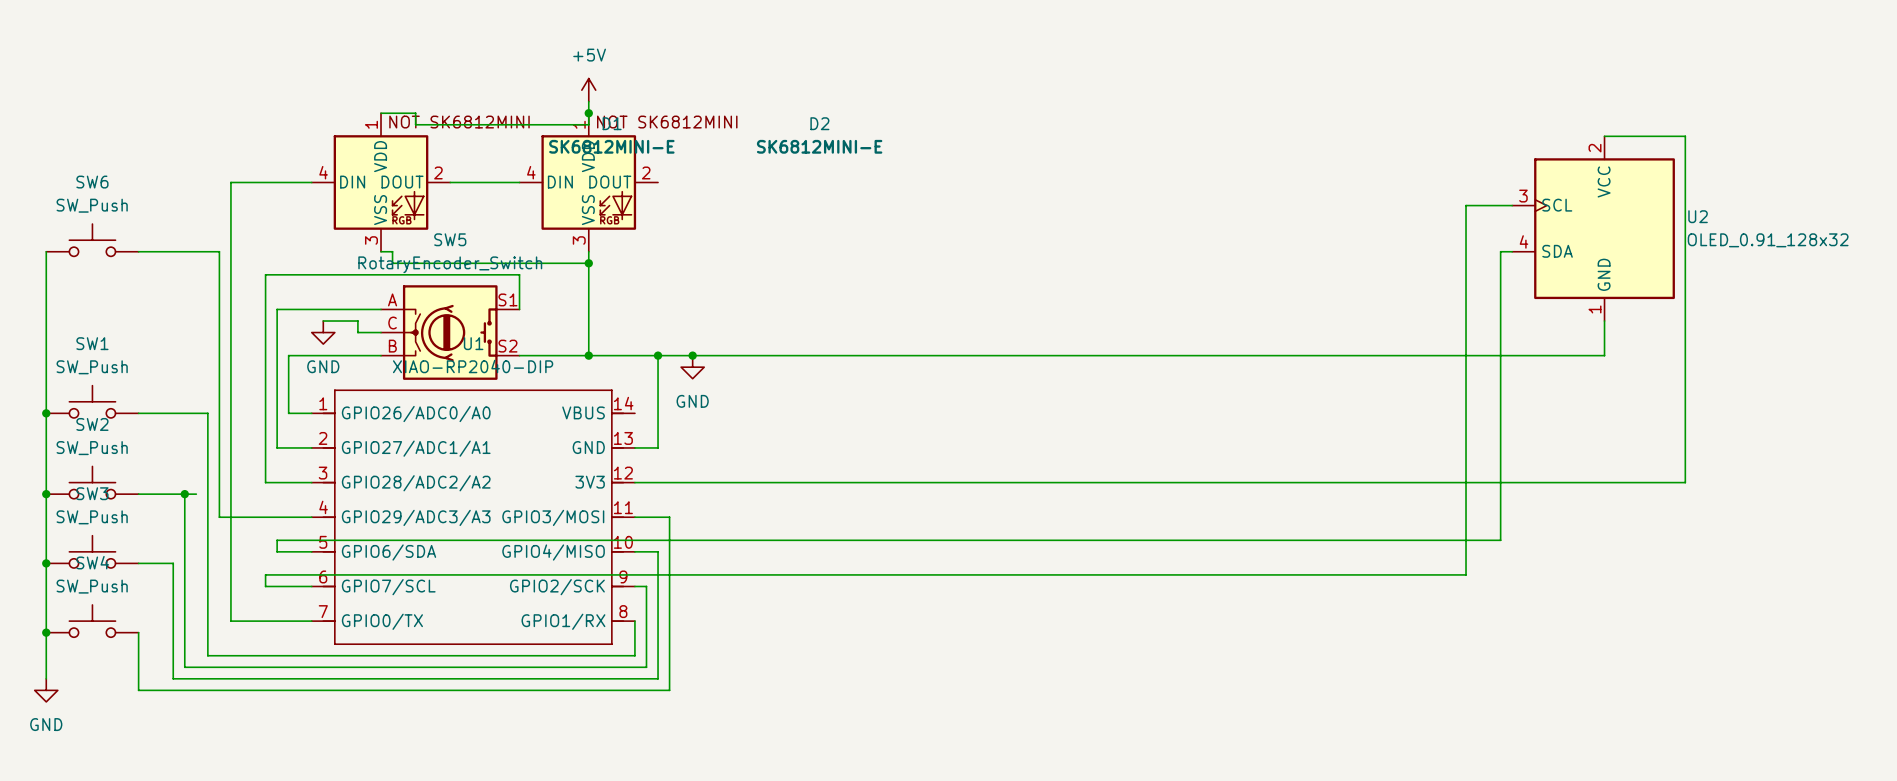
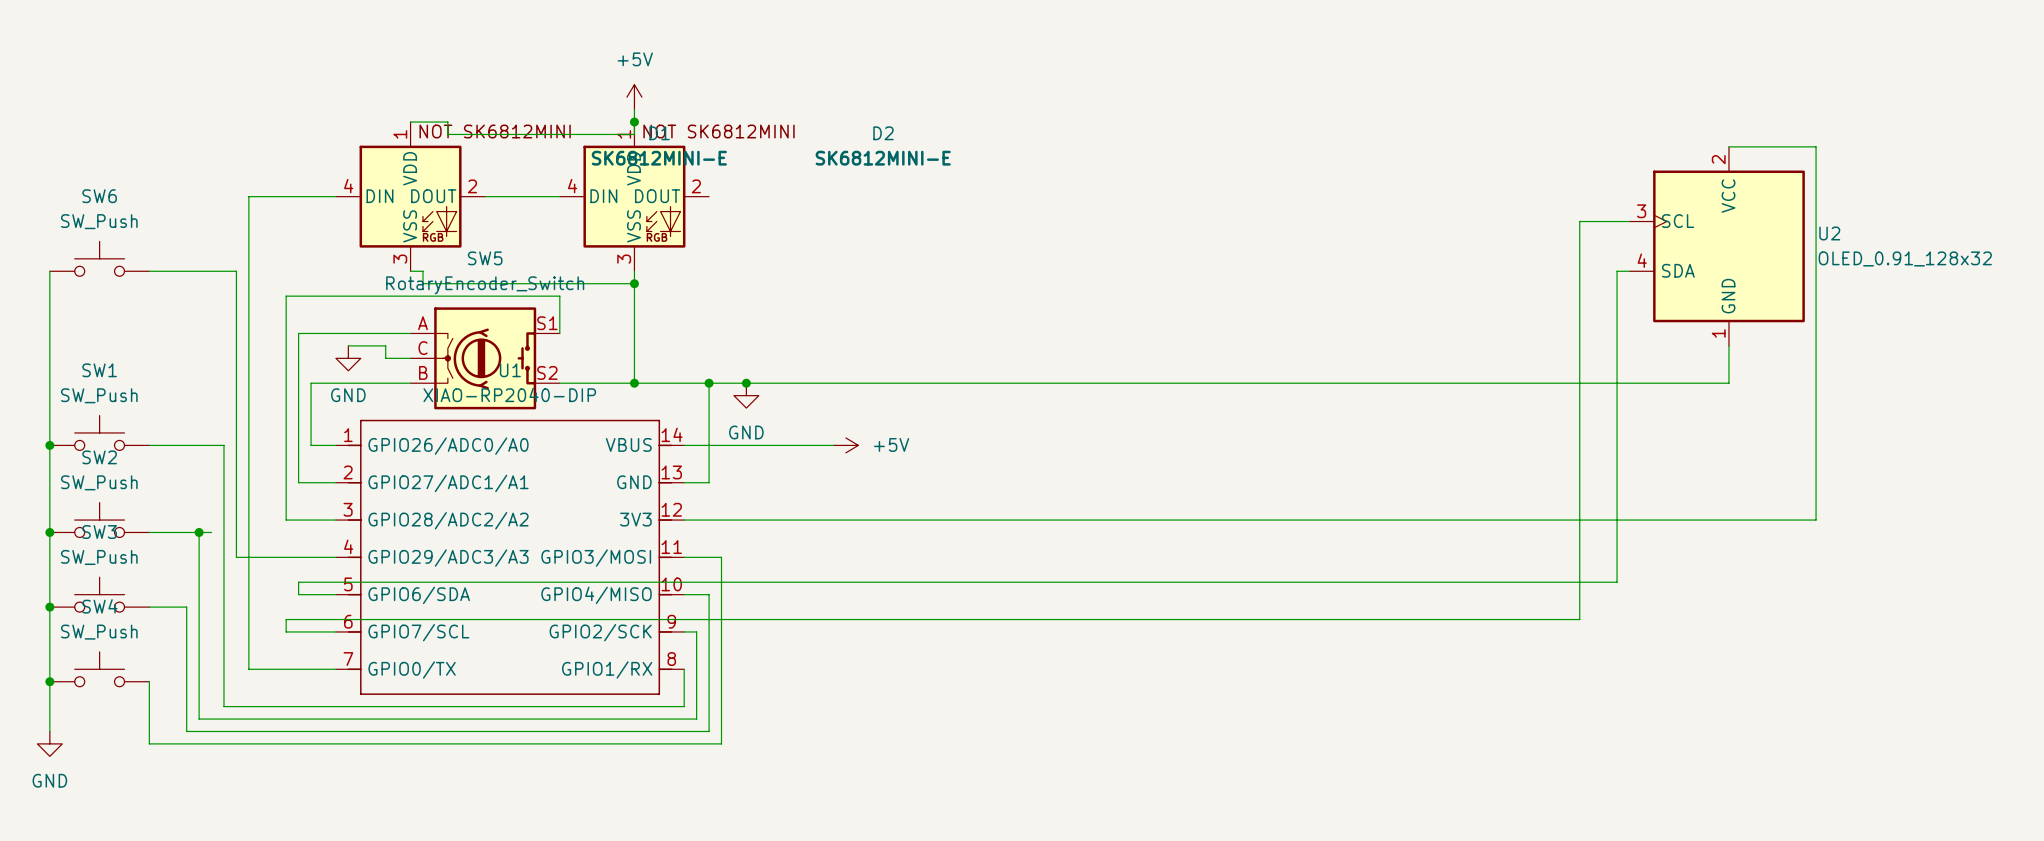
wire: none -> (684, 445) (833, 445)
power symbol: none -> +5V (845, 445)

